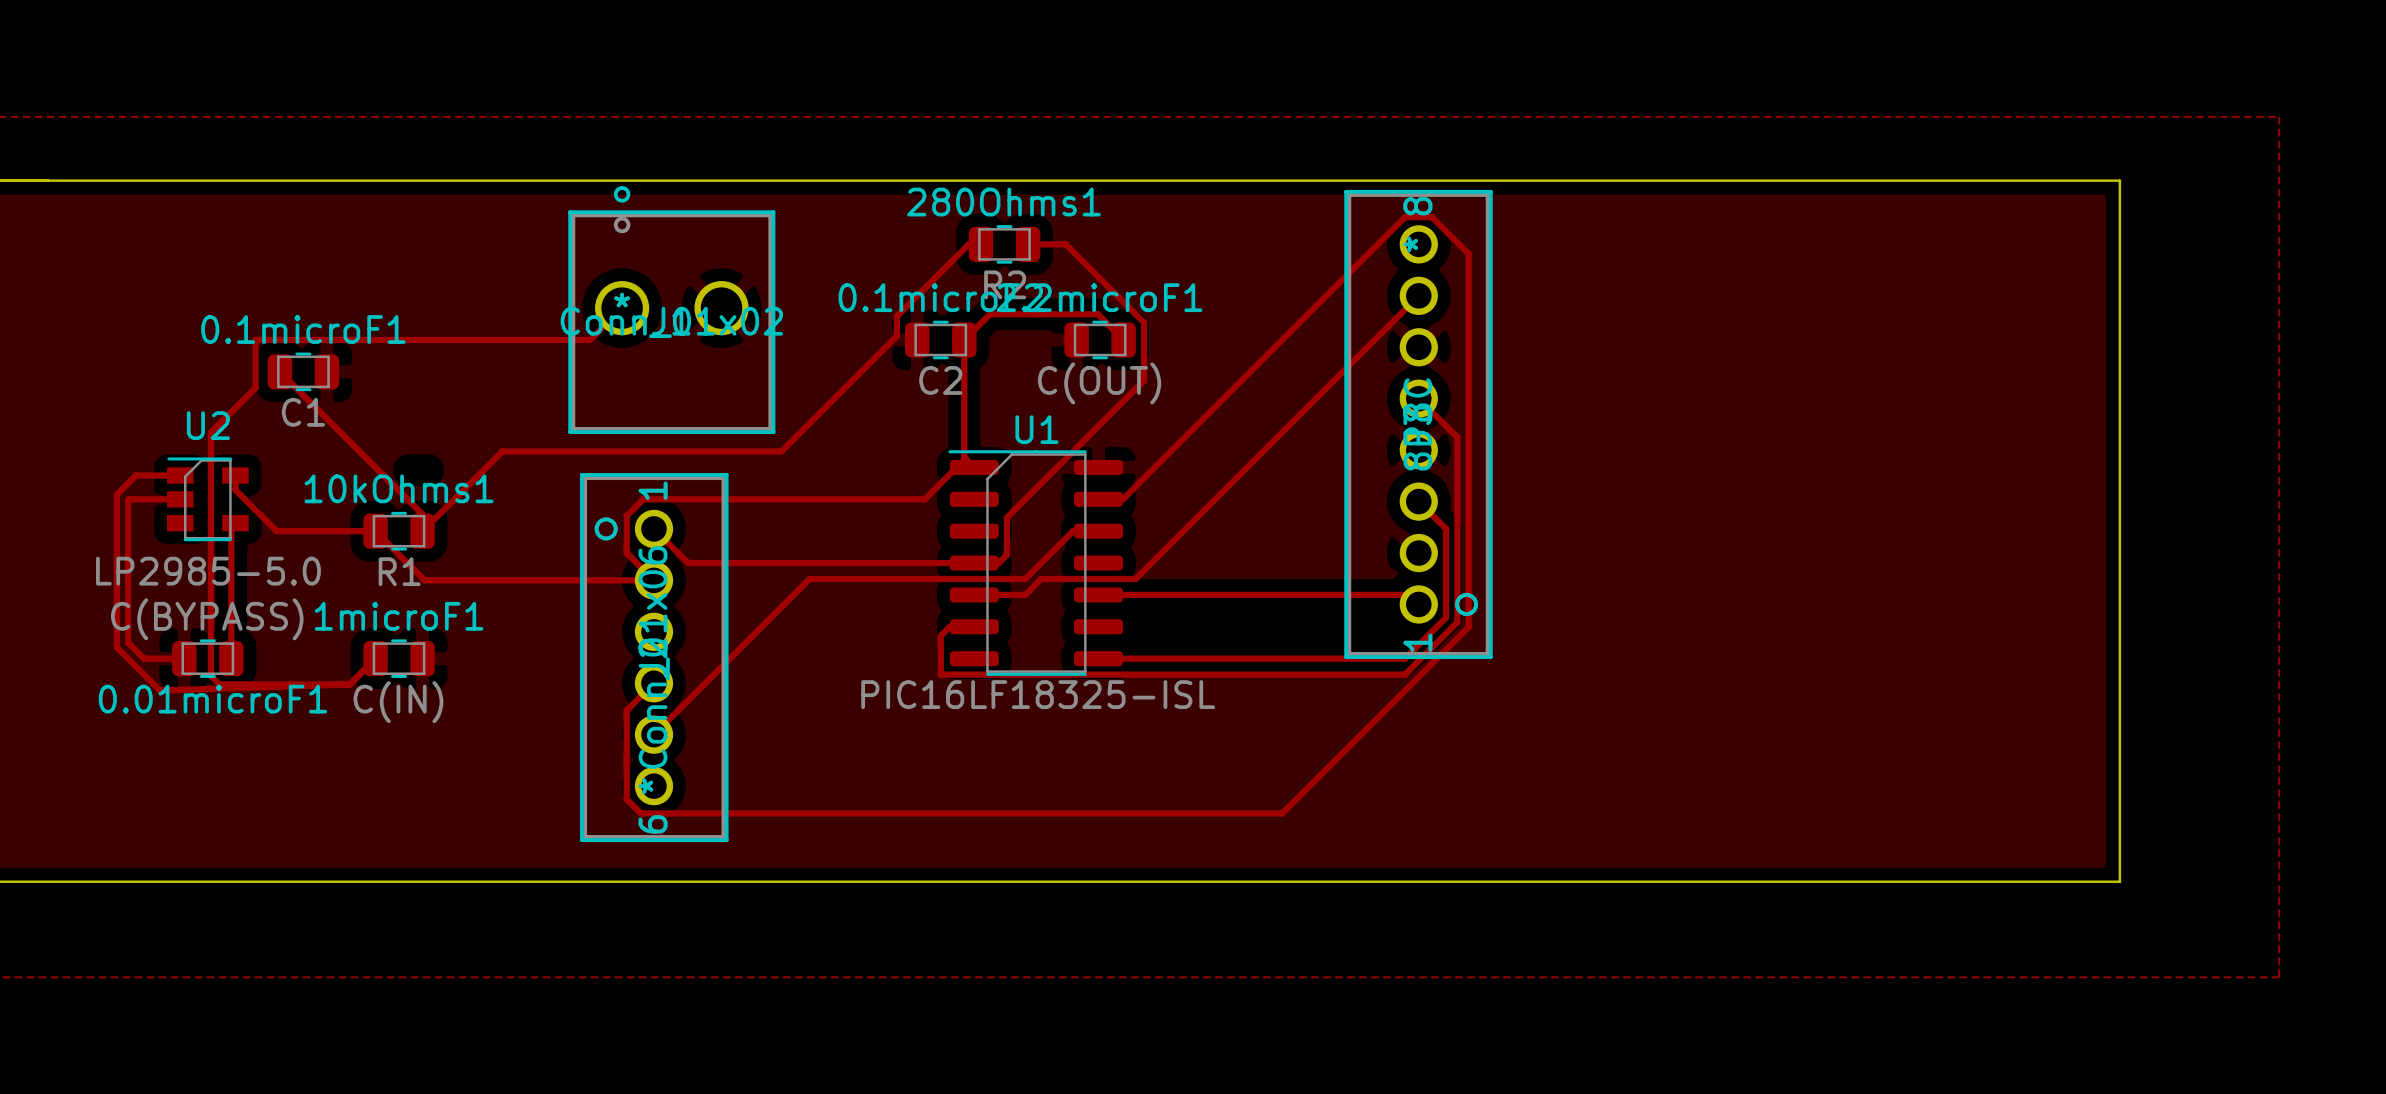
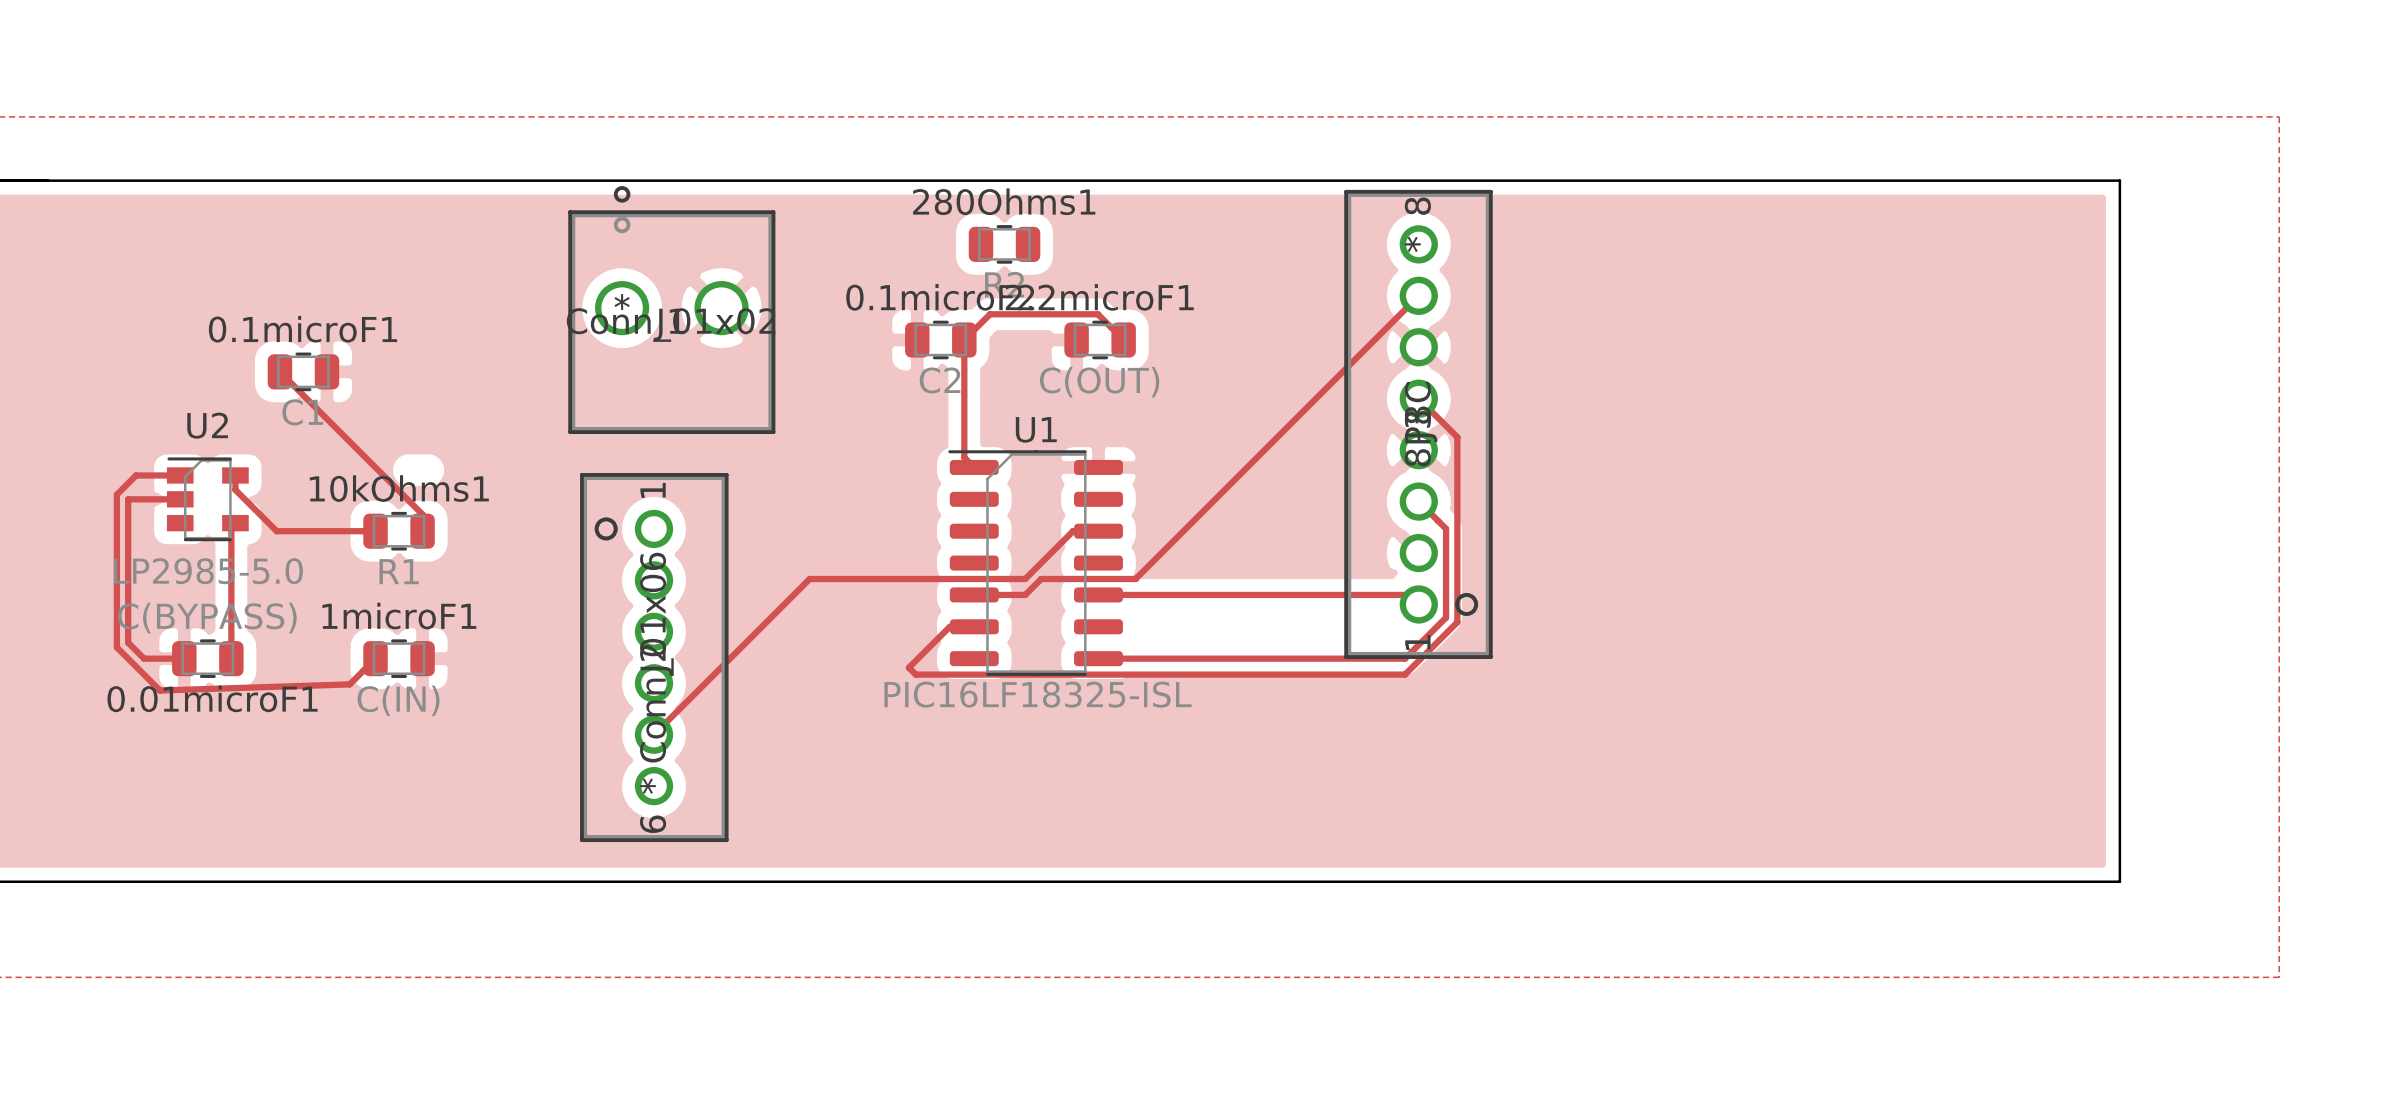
track: (981, 244) (968, 244) (896, 316) (896, 336) (781, 451) (502, 451) (422, 531) -> none
track: (1028, 244) (1065, 244) (1144, 322) (1144, 380) (1006, 517) (1006, 554) (998, 563) (688, 563) (653, 528) -> none
track: (622, 308) (590, 339) (255, 339) (255, 387) (210, 432) (210, 676) (219, 684) (349, 684) -> none
track: (966, 459) (964, 459) (924, 499) (643, 499) (626, 515) (626, 553) (653, 580) (424, 580) (375, 531) -> none
track: (1098, 499) (1122, 499) (1405, 217) (1431, 217) (1468, 253) (1468, 626) (1282, 813) (640, 813) (626, 799) (626, 710) (653, 683) -> none
track: (940, 635) (940, 674) -> (940, 635) (908, 667) (915, 674) (940, 674)

